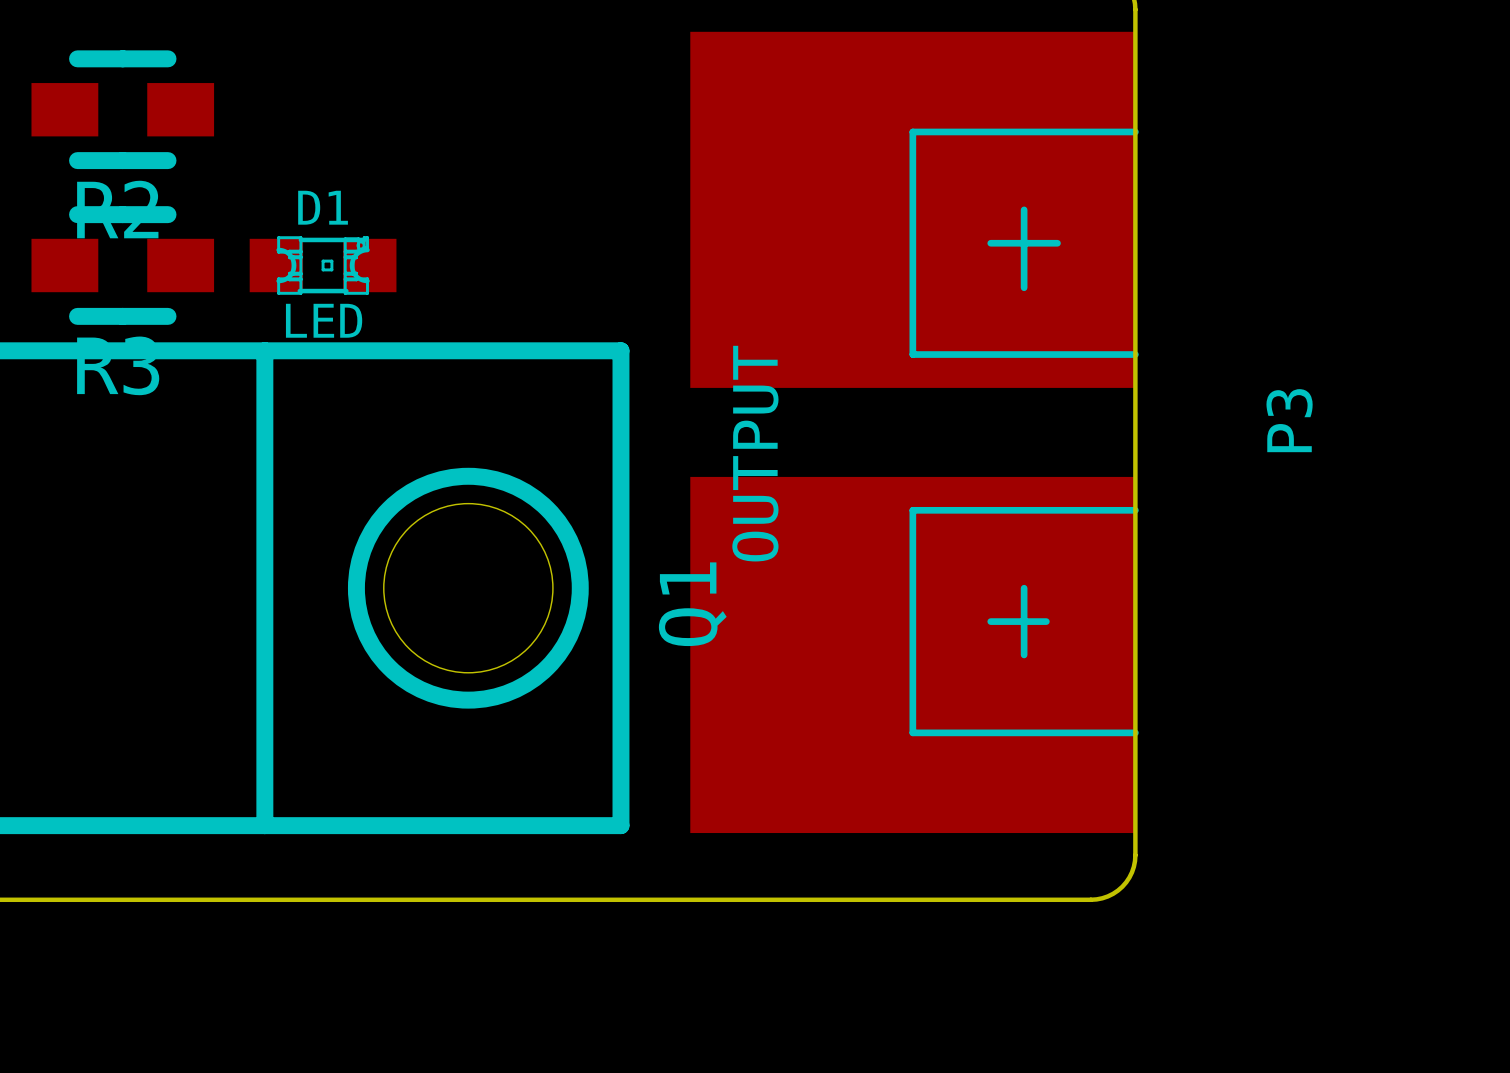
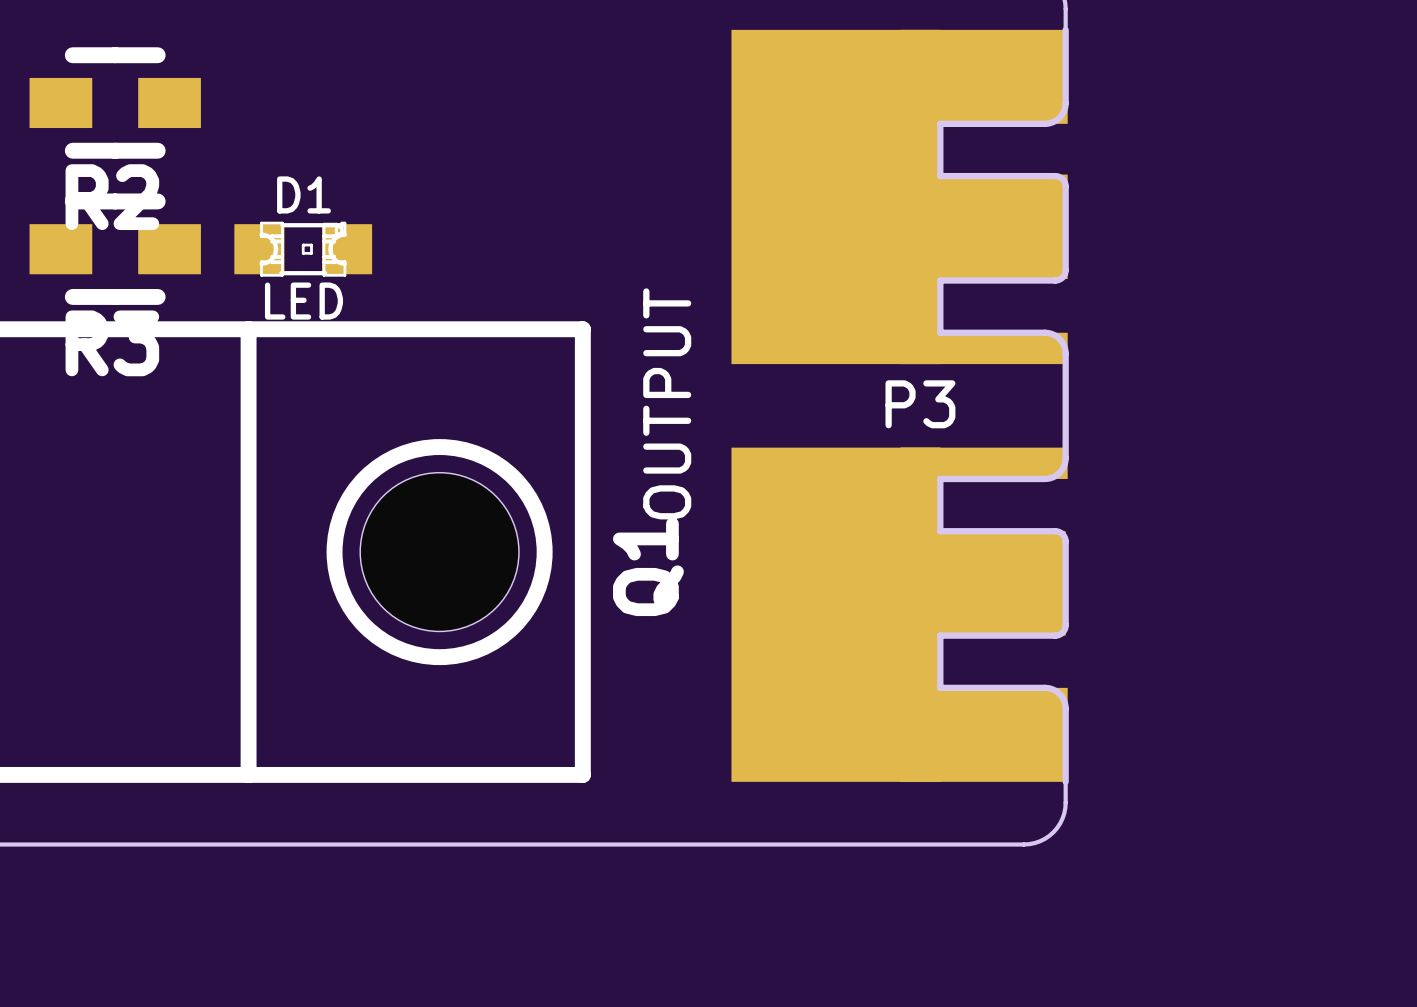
P3 footprint: [690, 31, 1139, 834] -> [731, 26, 1069, 785]
board edge: (1135, 31) (1135, 833) -> none
P3 name position: P3 (1289, 420) -> P3 (920, 404)
P3 value position: OUTPUT (755, 453) -> OUTPUT (667, 403)

